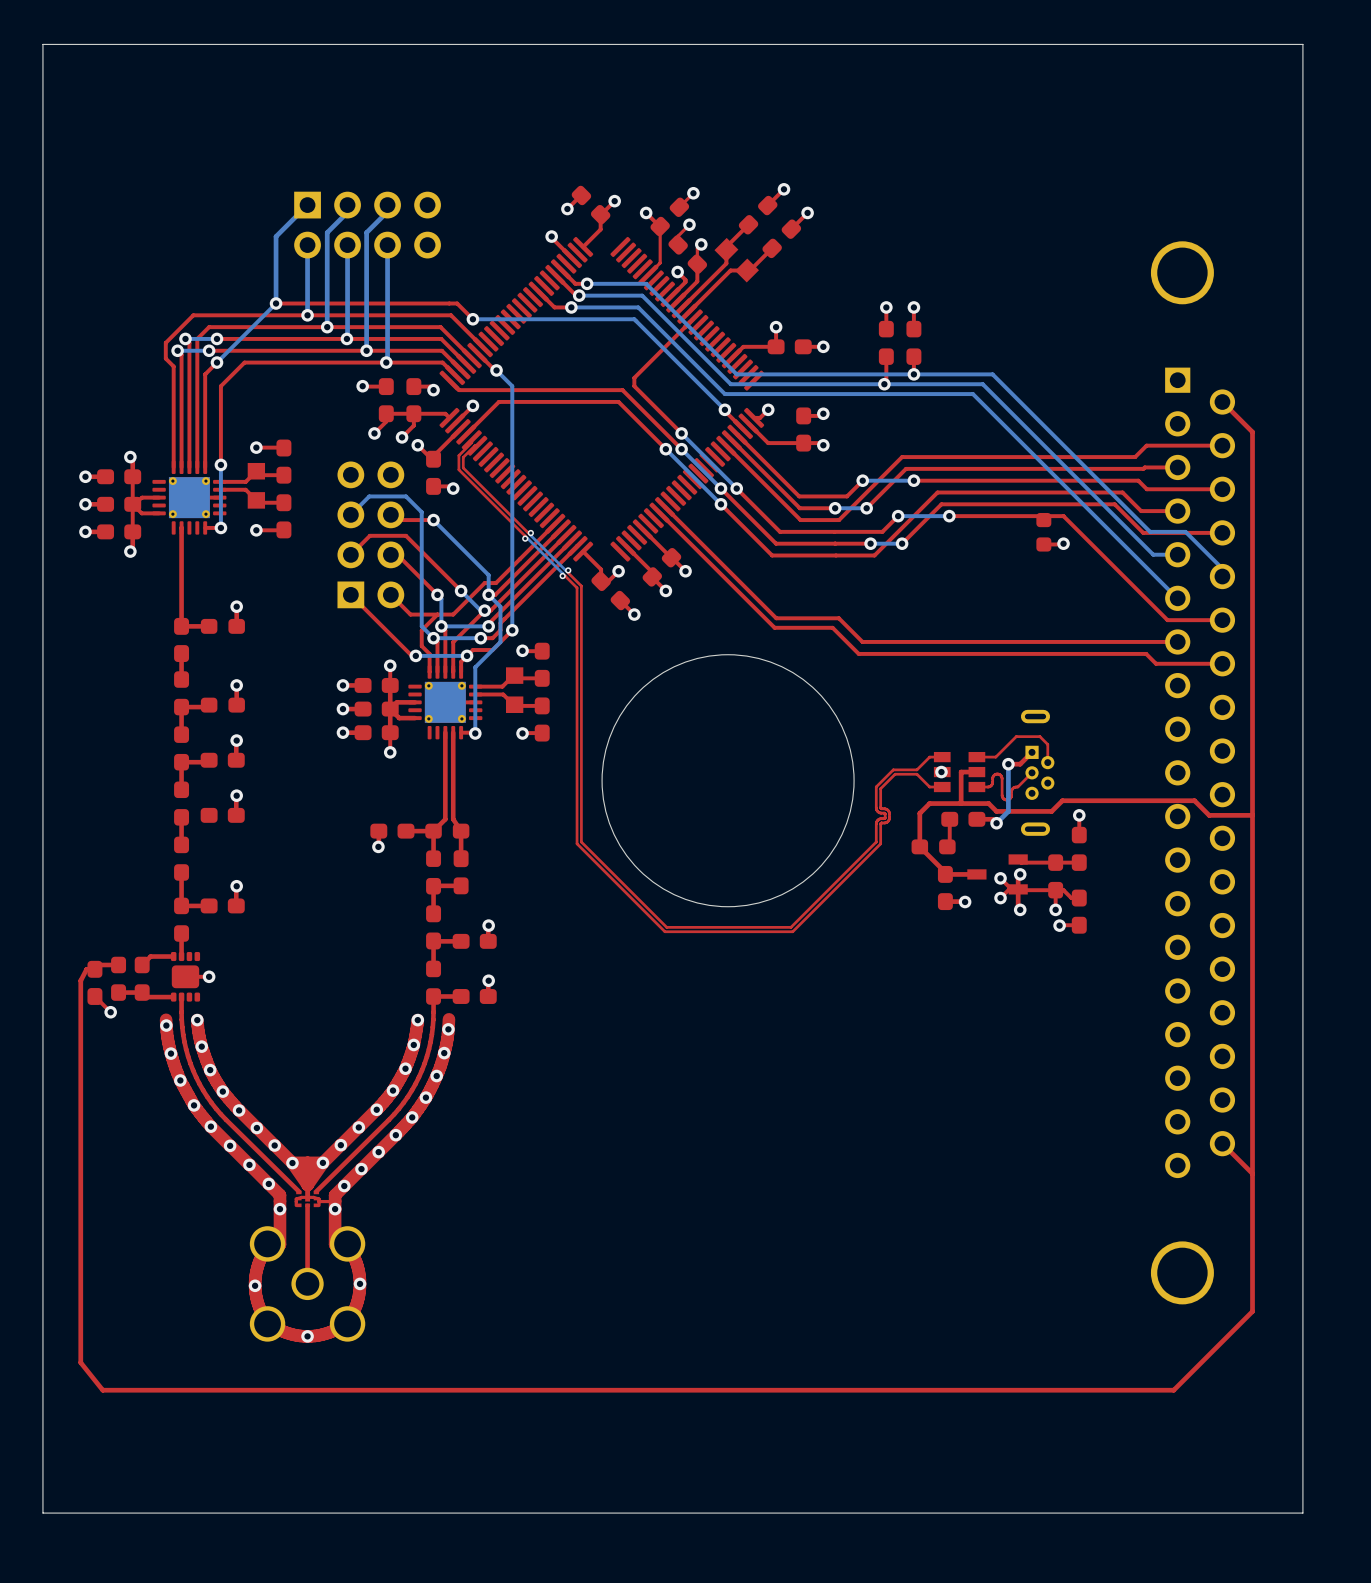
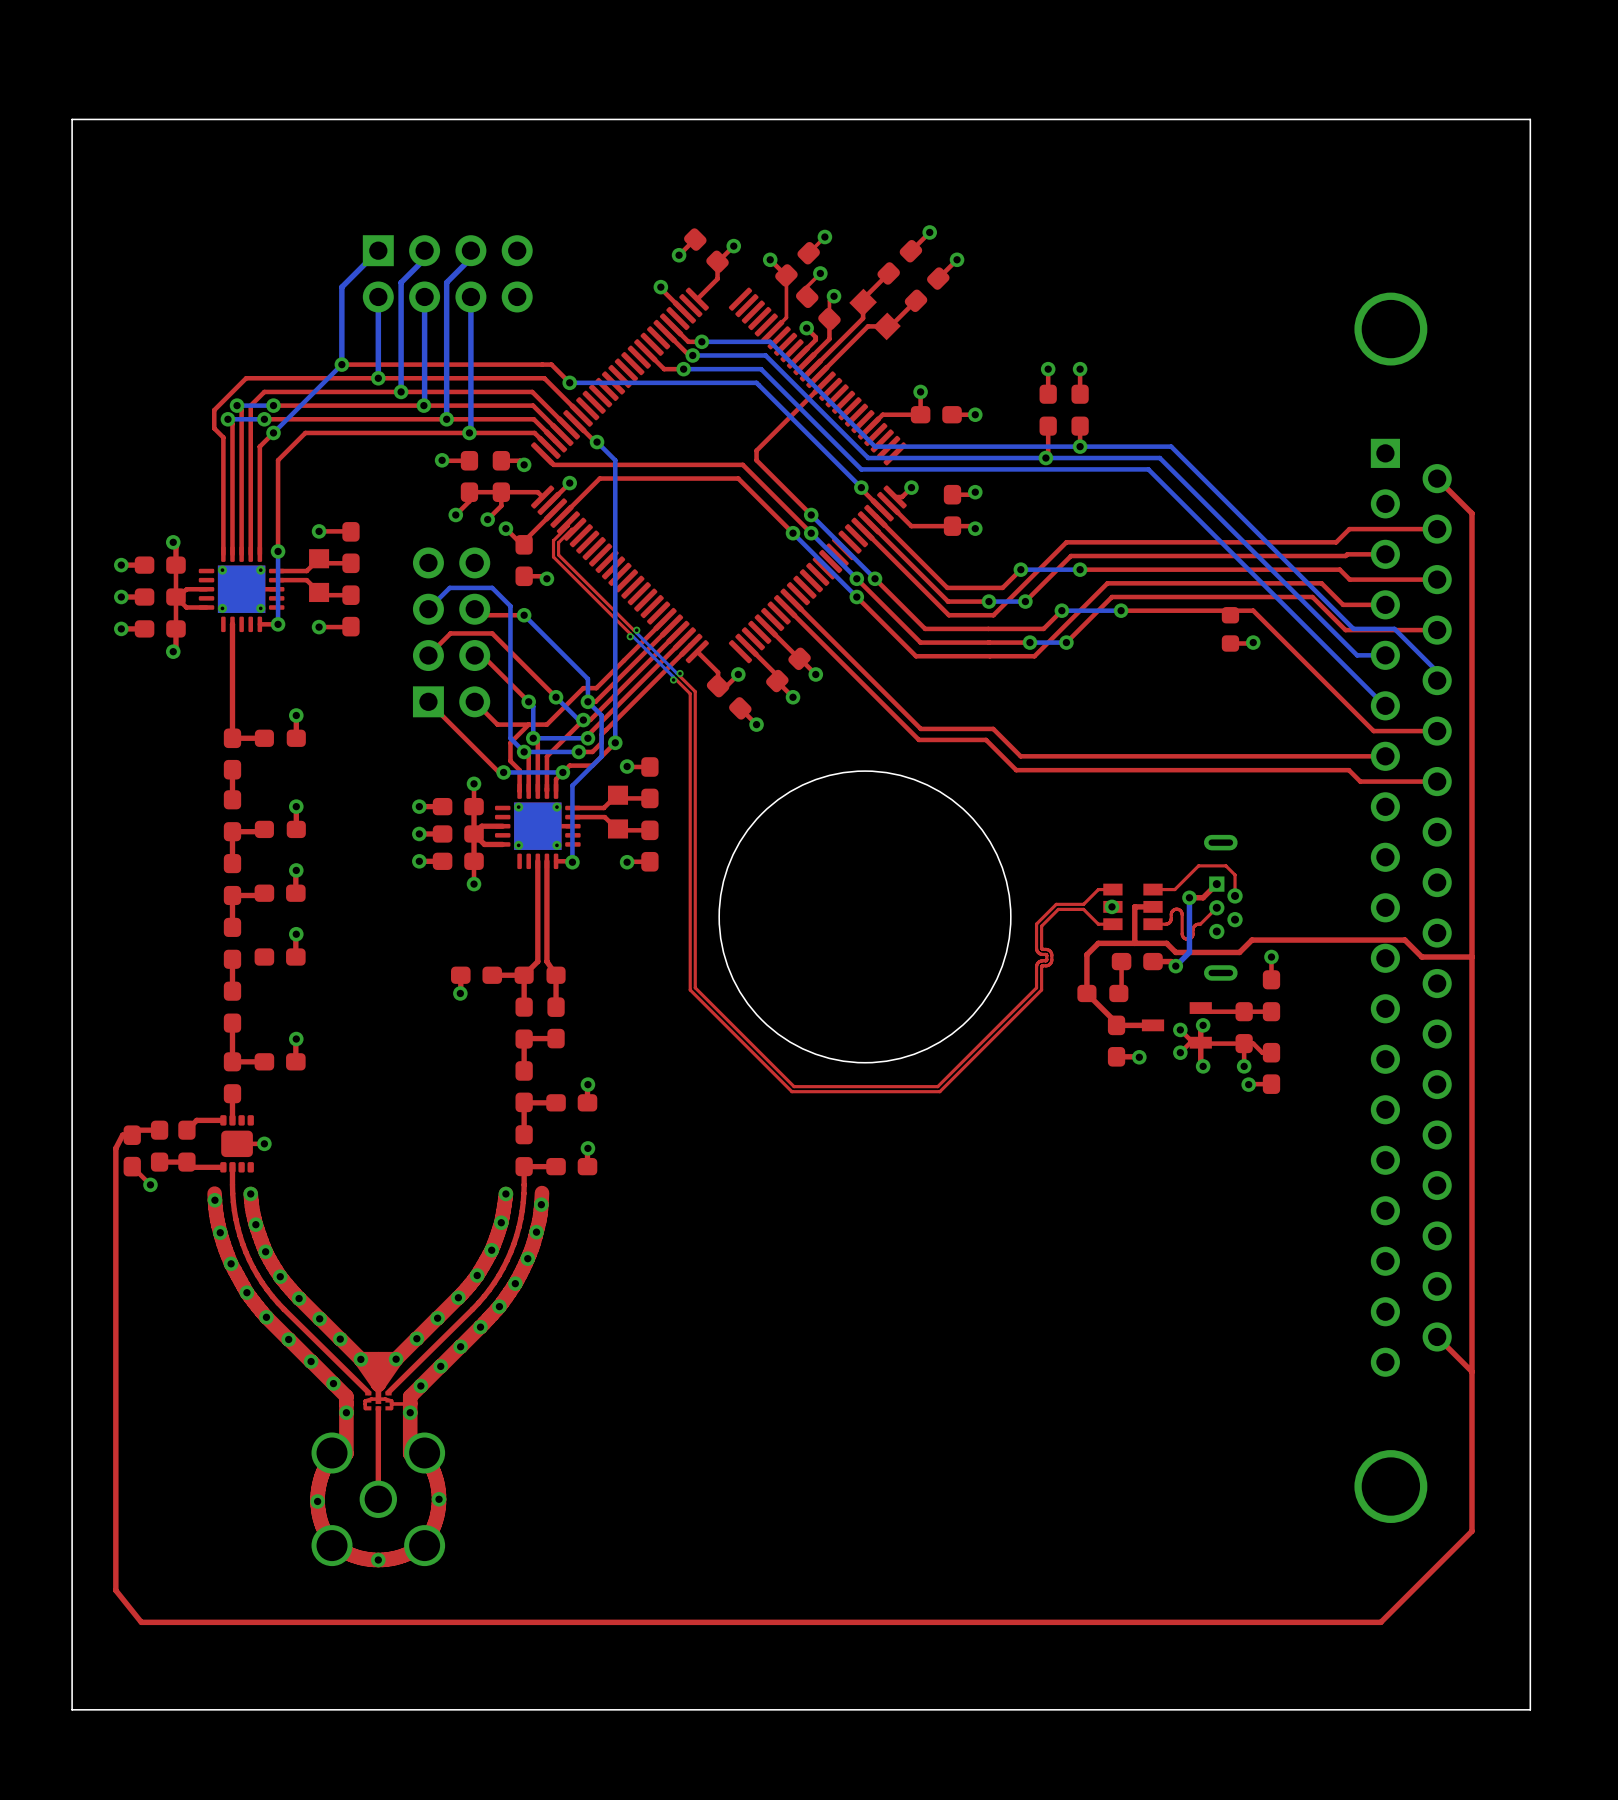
board edge: (1302, 91) (1302, 44) (42, 44) (42, 91) -> (1530, 119) (72, 119)
board edge: (1302, 1465) (1302, 1513) (42, 1513) (42, 1465) -> (1530, 1709) (72, 1709)

